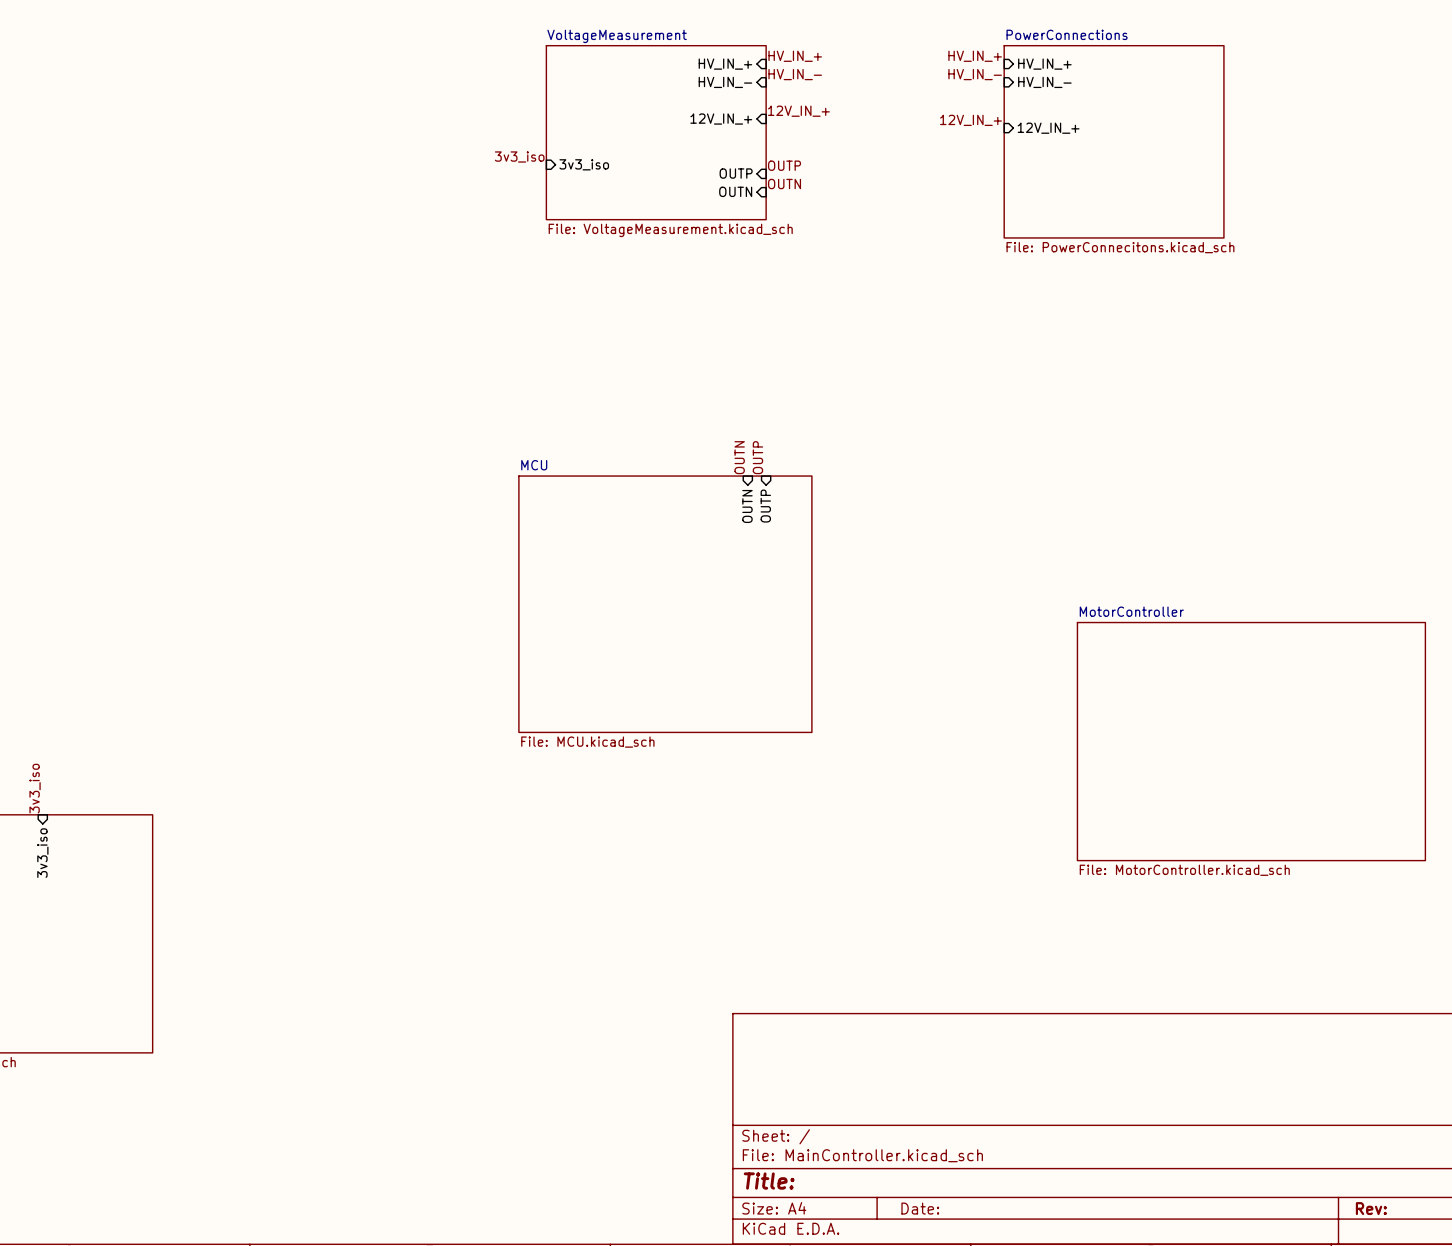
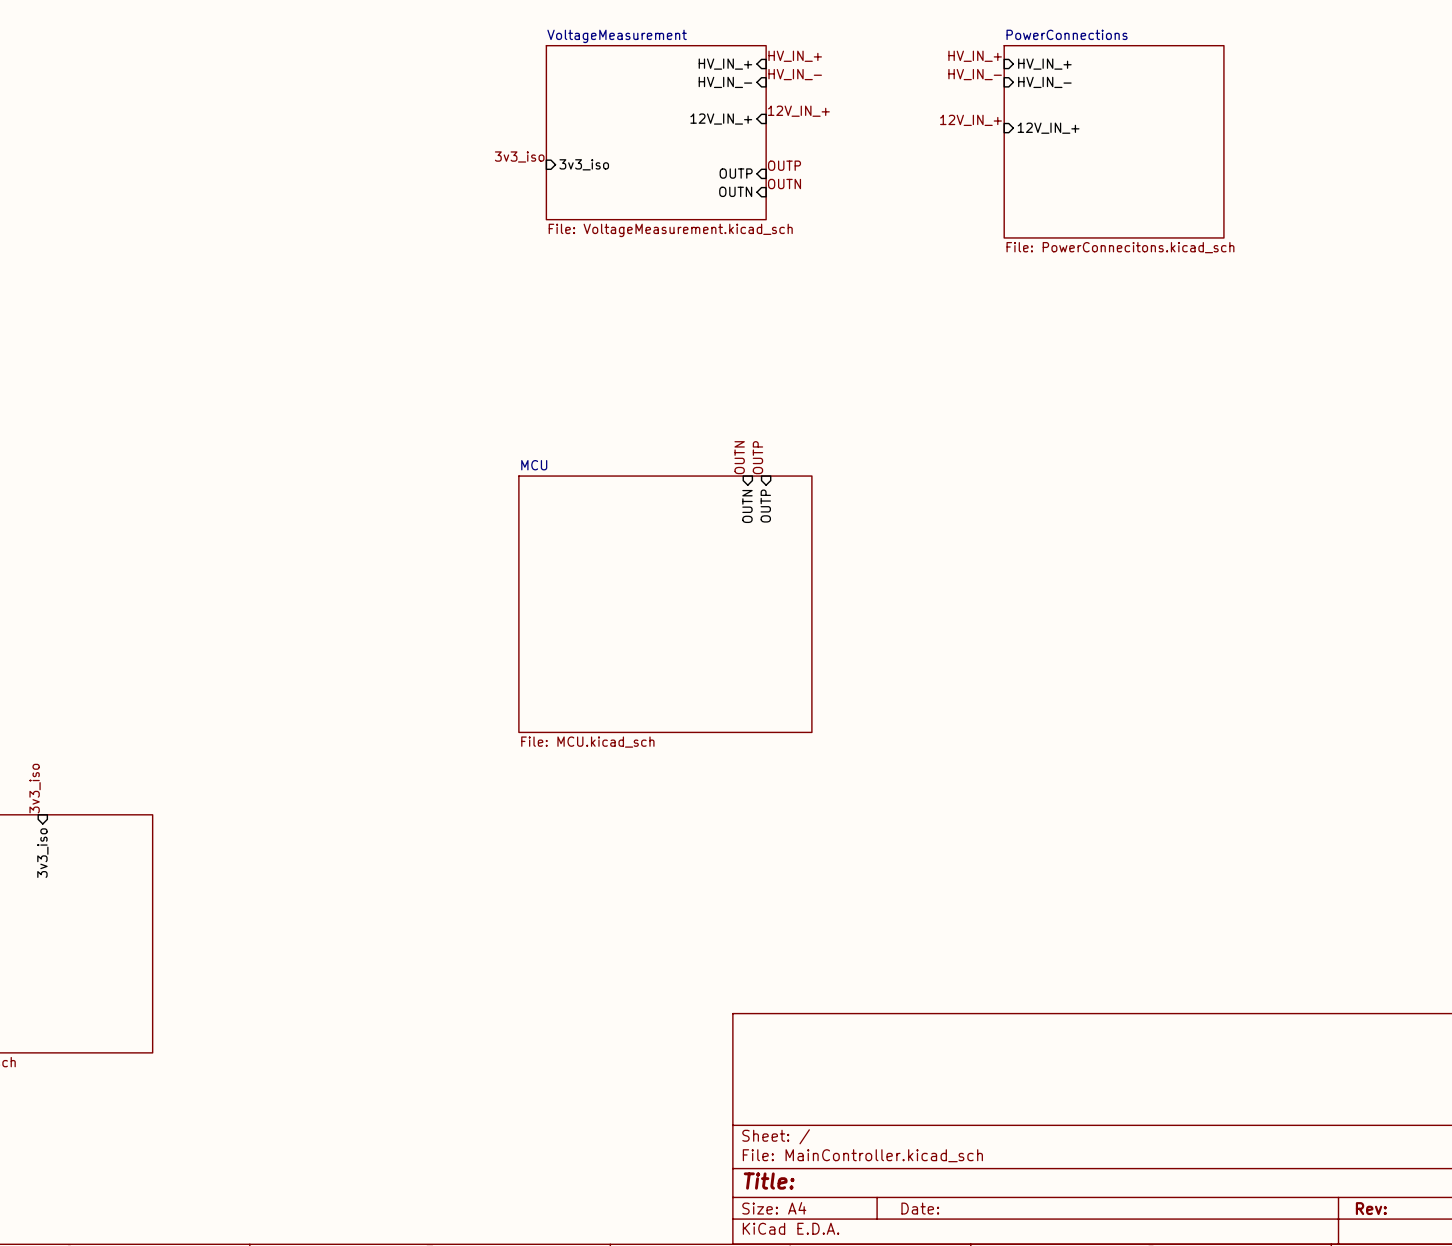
sheet MotorController: File: MotorController.kicad_sch (1251, 741) -> none

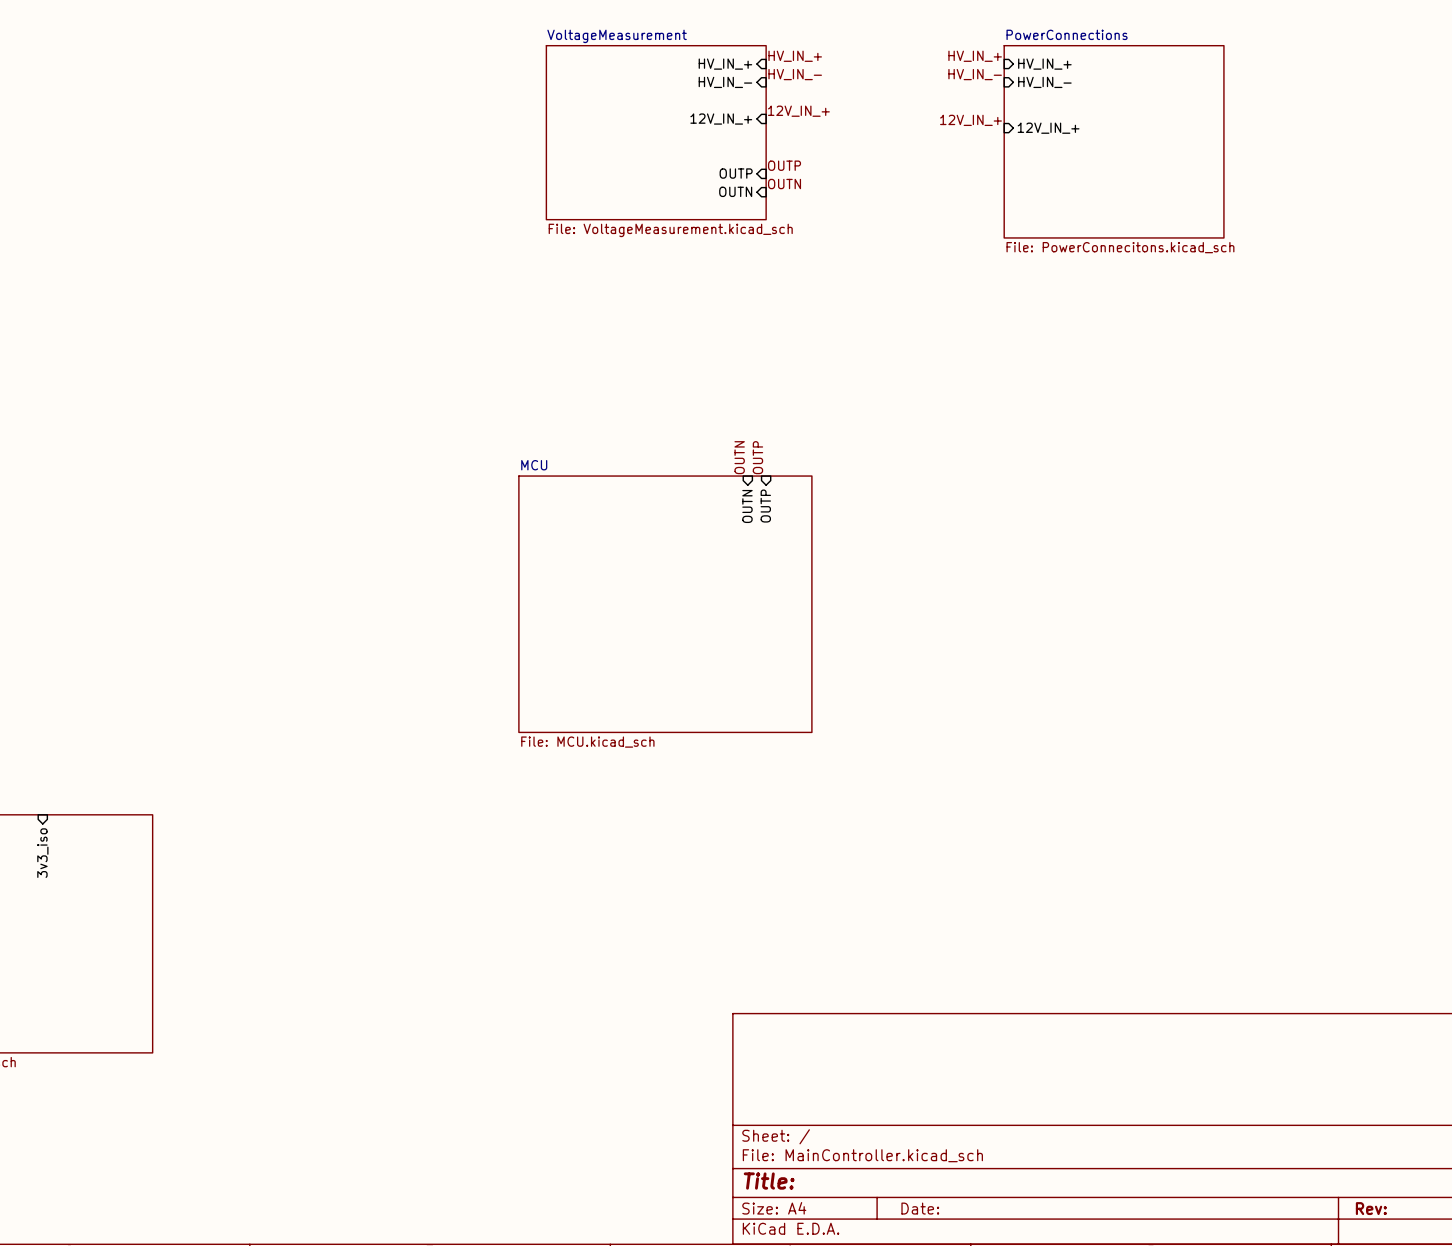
label: 3v3_iso (519, 156) -> none
sheet pin: 3v3_iso (584, 164) -> none
label: 3v3_iso (35, 788) -> none

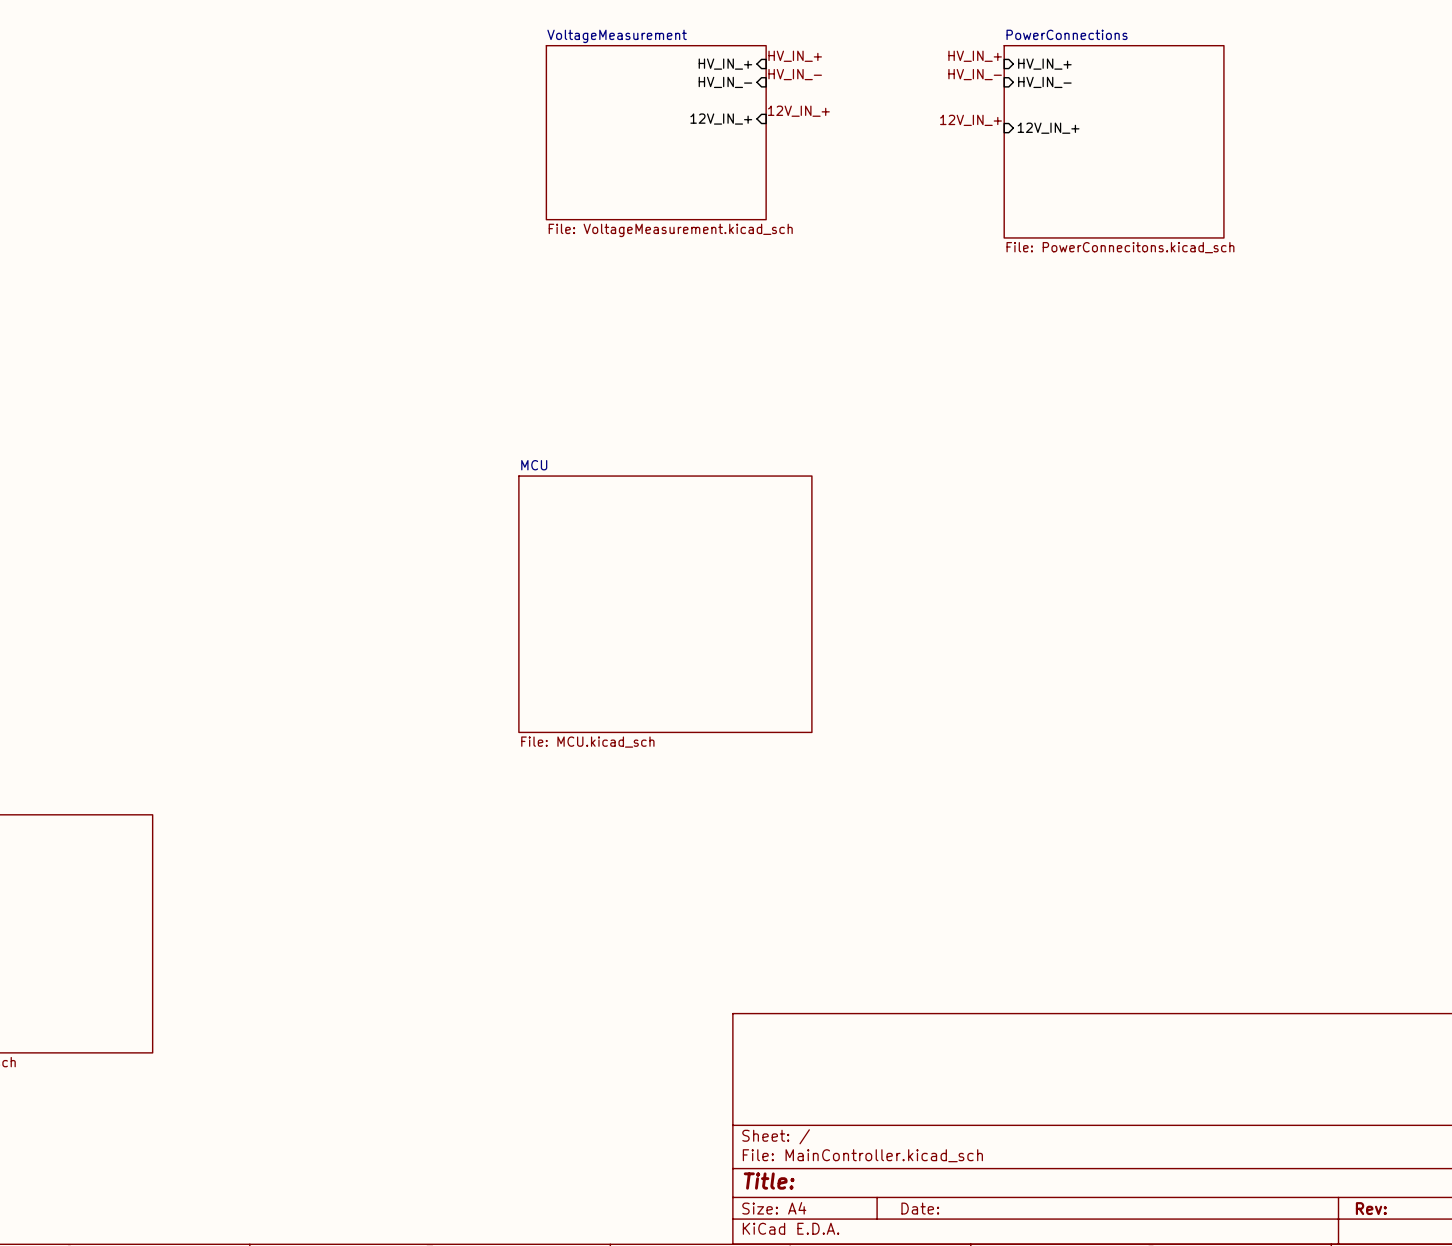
label: OUTP (784, 165) -> none
sheet pin: OUTP (736, 173) -> none
label: OUTN (784, 184) -> none
sheet pin: OUTN (735, 191) -> none
label: OUTN (739, 457) -> none
label: OUTP (757, 457) -> none
sheet pin: OUTN (747, 506) -> none
sheet pin: OUTP (765, 506) -> none
sheet pin: 3v3_iso (42, 853) -> none

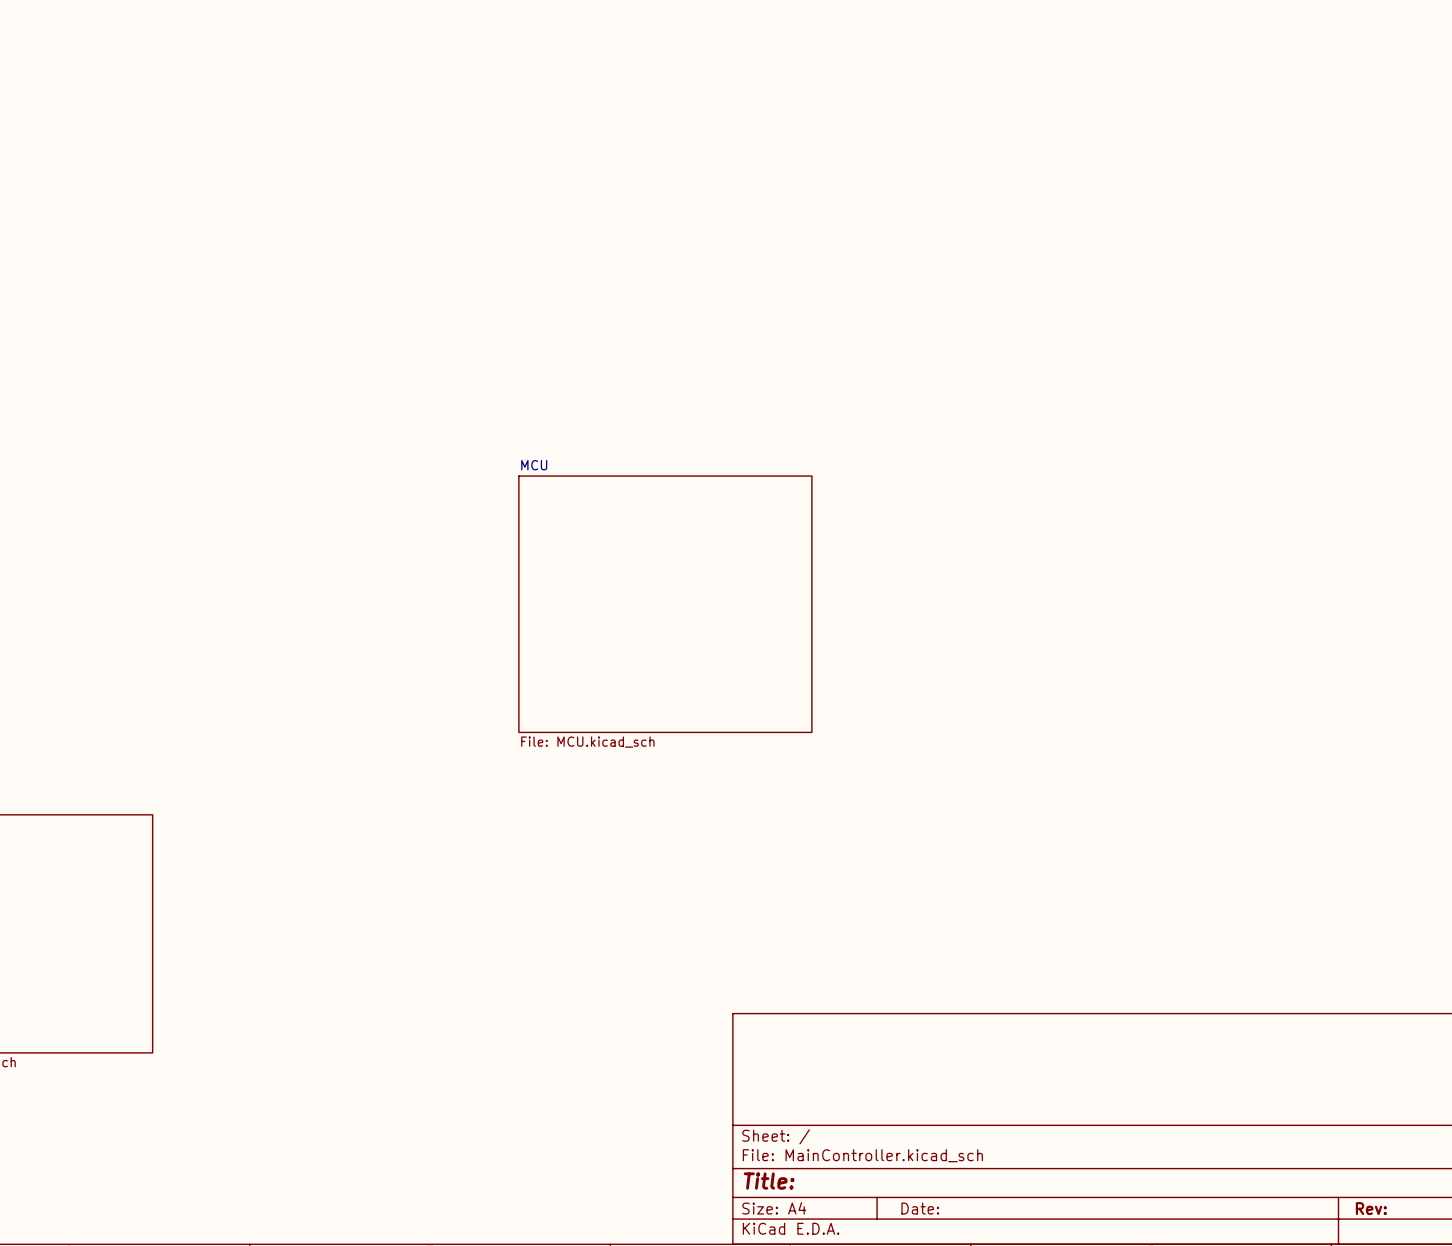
label: HV_IN_+ (795, 56) -> none
label: HV_IN_+ (975, 56) -> none
sheet pin: HV_IN_+ (725, 64) -> none
sheet pin: HV_IN_+ (1044, 64) -> none
label: HV_IN_- (795, 74) -> none
label: HV_IN_- (975, 74) -> none
sheet pin: HV_IN_- (725, 82) -> none
sheet pin: HV_IN_- (1044, 82) -> none
label: 12V_IN_+ (798, 111) -> none
sheet pin: 12V_IN_+ (721, 119) -> none
label: 12V_IN_+ (970, 120) -> none
sheet pin: 12V_IN_+ (1048, 128) -> none
sheet VoltageMeasurement: File: VoltageMeasurement.kicad_sch (656, 132) -> none
sheet PowerConnections: File: PowerConnecitons.kicad_sch (1114, 141) -> none

